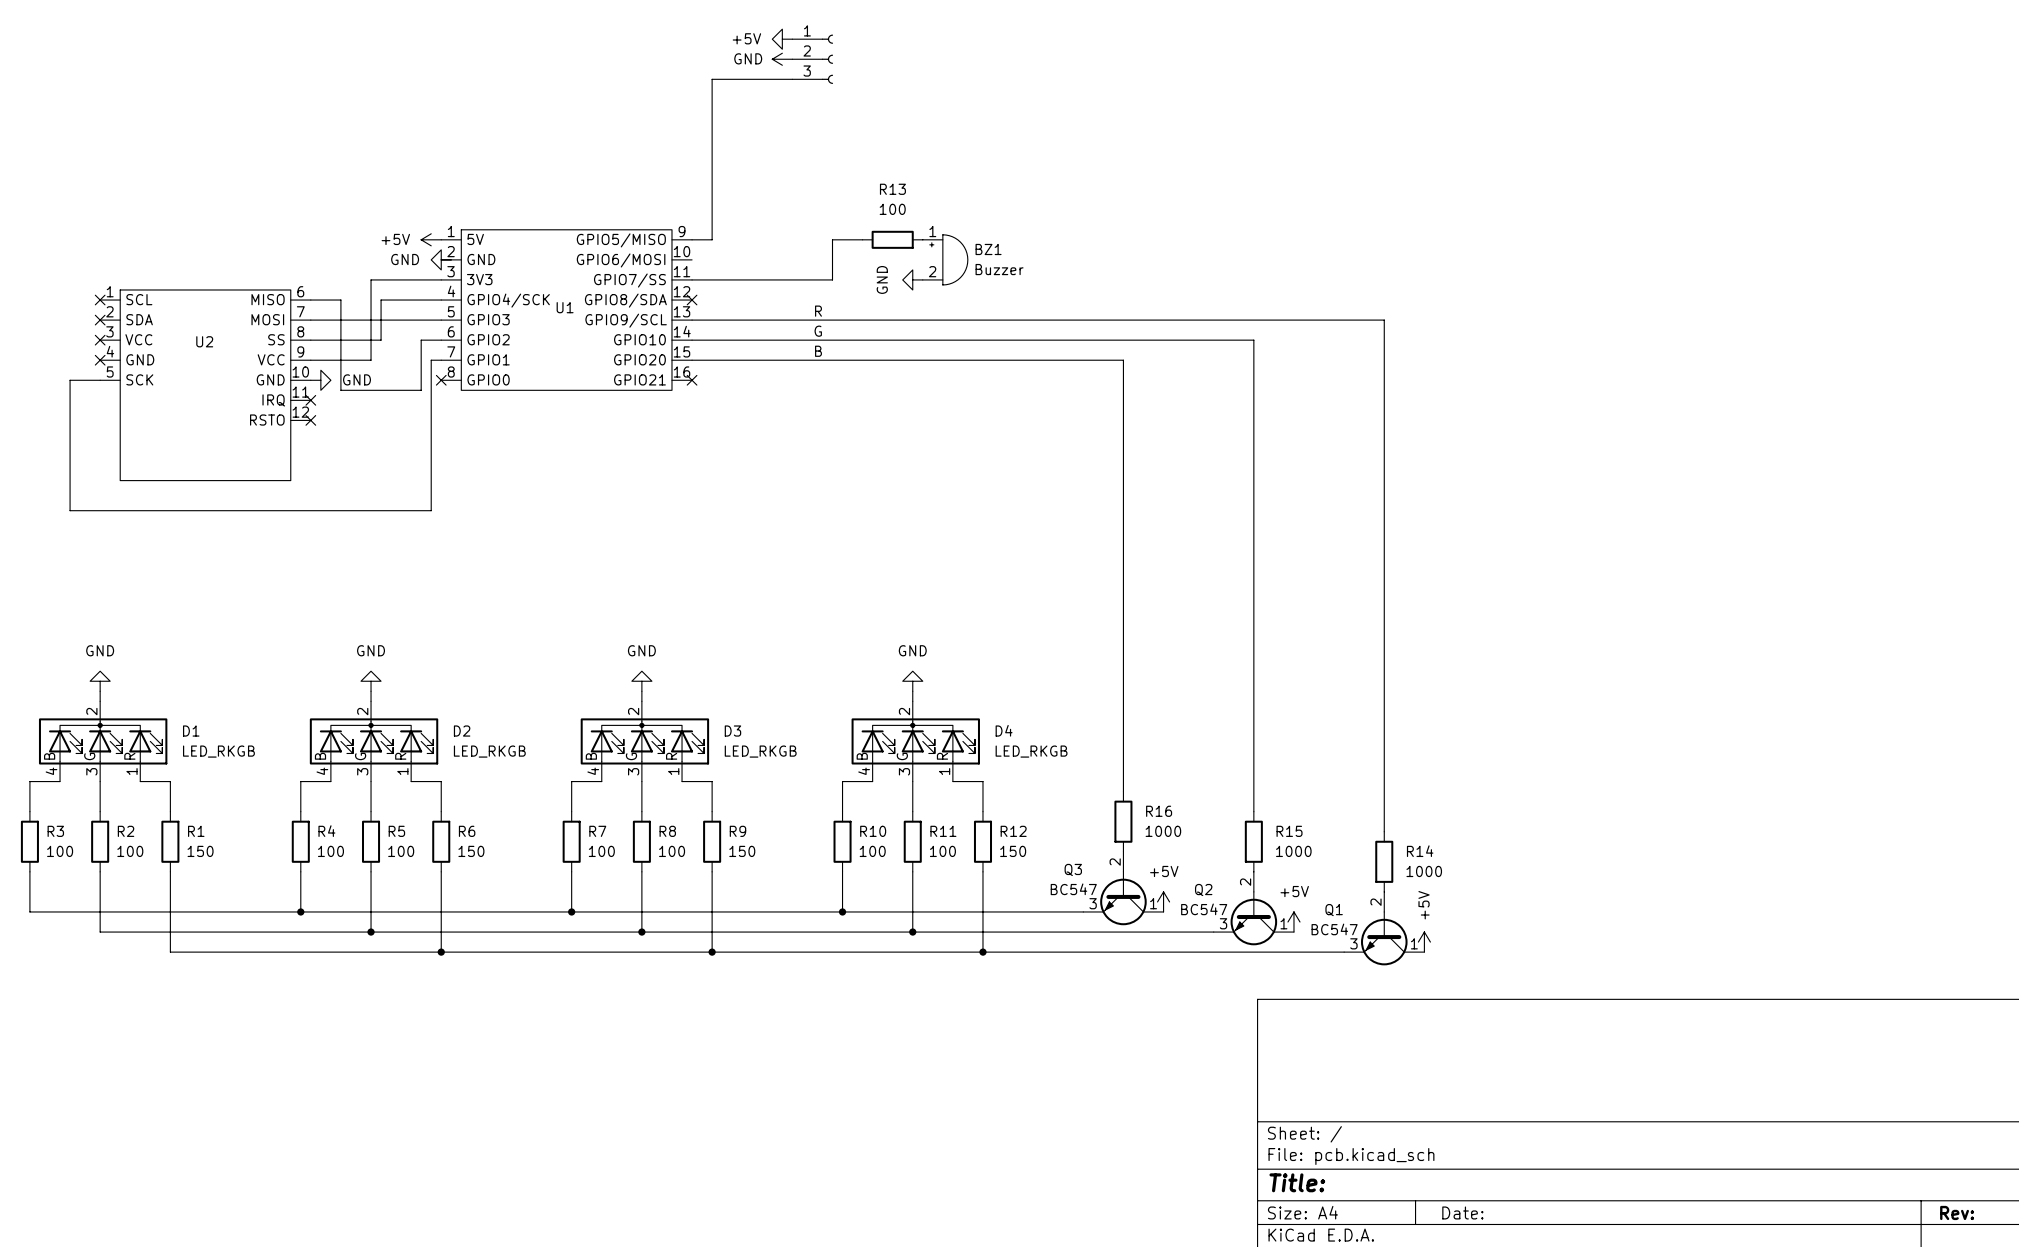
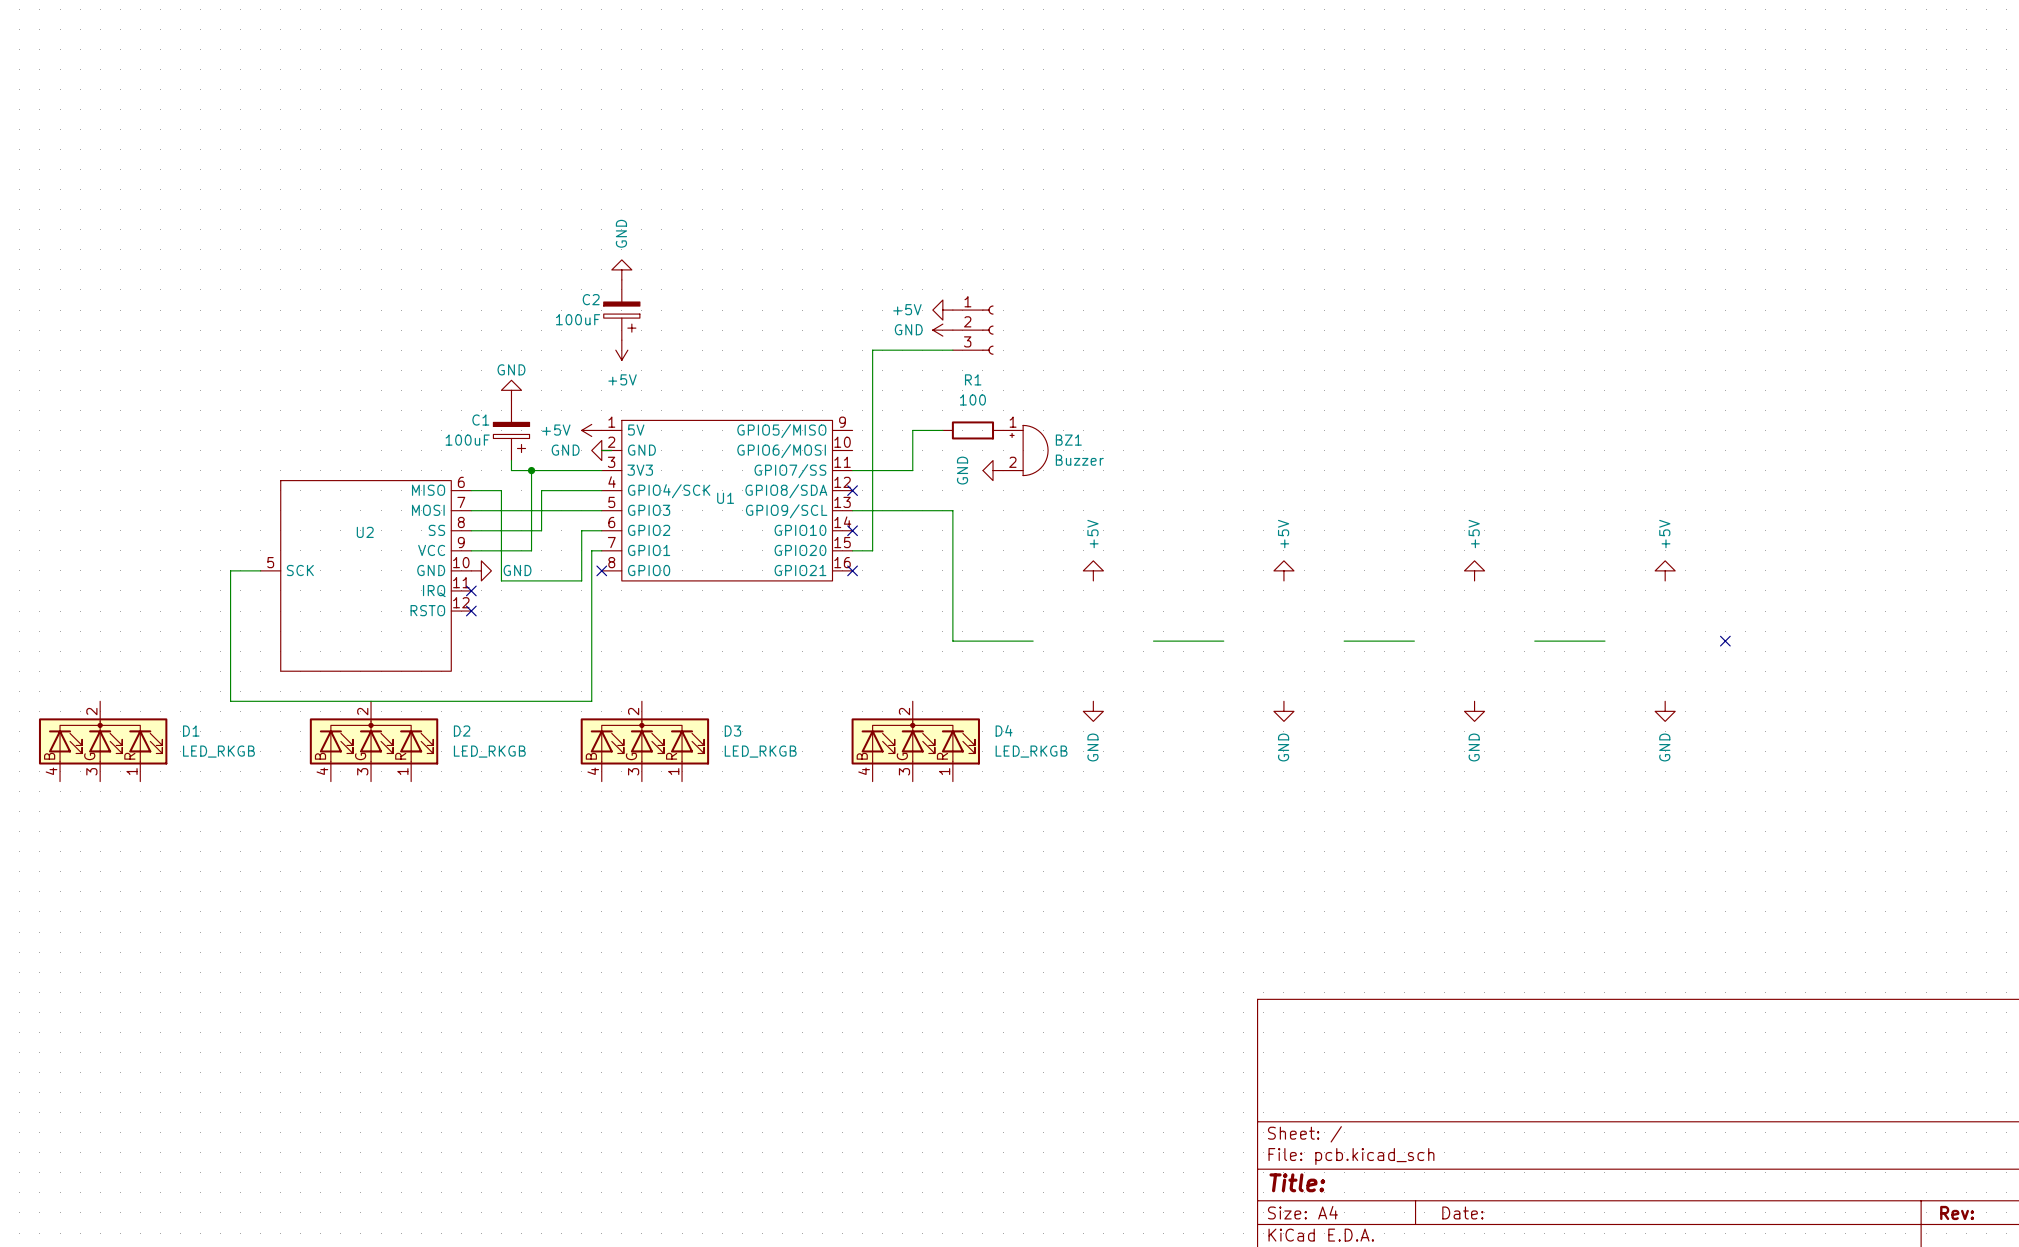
power symbol: +5V (782, 39) -> none
power symbol: GND (782, 59) -> none
part: (812, 59) -> none
wire: (792, 79) (712, 79) (712, 239) (692, 239) -> none
power symbol: +5V (431, 239) -> none
wire: (862, 239) (832, 239) (832, 279) (692, 279) -> none
R13: 100 (892, 239) -> none
power symbol: GND (441, 259) -> none
BZ1 position: (945, 259) -> (1025, 450)
power symbol: none -> GND (621, 269)
wire: (441, 279) (371, 279) (371, 360) (310, 360) -> none
power symbol: GND (912, 279) -> none
U2 symbol: [100, 289, 311, 481] -> [260, 480, 472, 672]
no-connect mark: (100, 300) -> none
wire: (310, 300) (340, 300) (340, 390) (421, 390) (421, 340) (441, 340) -> none
wire: (441, 300) (381, 300) (381, 340) (310, 340) -> none
no-connect mark: (692, 300) -> none
U1 position: (566, 310) -> (727, 500)
C2: none -> 100uF (621, 310)
power symbol: none -> +5V (942, 310)
label: R (818, 311) -> none
no-connect mark: (100, 320) -> none
wire: (310, 320) (441, 320) -> none
wire: (692, 320) (1384, 320) (1384, 831) -> none
power symbol: none -> GND (942, 330)
part: none -> (973, 330)
label: G (818, 331) -> none
no-connect mark: (100, 340) -> none
wire: (692, 340) (1253, 340) (1253, 811) -> none
power symbol: none -> +5V (621, 350)
wire: none -> (952, 350) (872, 350) (872, 550) (852, 550)
label: B (818, 351) -> none
no-connect mark: (100, 360) -> none
wire: (441, 360) (431, 360) (431, 510) (70, 510) (70, 380) (100, 380) -> none
wire: (692, 360) (1123, 360) (1123, 791) -> none
power symbol: GND (320, 380) -> none
no-connect mark: (441, 380) -> none
no-connect mark: (692, 380) -> none
power symbol: none -> GND (511, 390)
no-connect mark: (310, 400) -> none
no-connect mark: (310, 420) -> none
C1: none -> 100uF (511, 430)
power symbol: none -> +5V (591, 430)
wire: none -> (942, 430) (912, 430) (912, 470) (852, 470)
wire: none -> (601, 450) (611, 450)
power symbol: none -> GND (601, 450)
wire: none -> (511, 460) (511, 470) (601, 470)
wire: none -> (531, 470) (531, 550) (471, 550)
junction: none -> (531, 470)
power symbol: none -> GND (993, 470)
wire: none -> (471, 490) (501, 490) (501, 580) (581, 580) (581, 530) (601, 530)
wire: none -> (601, 490) (541, 490) (541, 530) (471, 530)
no-connect mark: none -> (852, 490)
wire: none -> (471, 510) (601, 510)
wire: none -> (852, 510) (952, 510) (952, 641) (1033, 641)
no-connect mark: none -> (852, 530)
wire: none -> (601, 550) (591, 550) (591, 701) (230, 701) (230, 570) (260, 570)
power symbol: none -> GND (481, 570)
no-connect mark: none -> (601, 570)
no-connect mark: none -> (852, 570)
power symbol: none -> +5V (1093, 570)
power symbol: none -> +5V (1283, 570)
power symbol: none -> +5V (1474, 570)
power symbol: none -> +5V (1665, 570)
no-connect mark: none -> (471, 590)
no-connect mark: none -> (471, 611)
wire: none -> (1153, 641) (1223, 641)
wire: none -> (1344, 641) (1414, 641)
wire: none -> (1534, 641) (1604, 641)
no-connect mark: none -> (1725, 641)
power symbol: GND (100, 681) -> none
power symbol: GND (371, 681) -> none
power symbol: GND (641, 681) -> none
power symbol: GND (912, 681) -> none
wire: (100, 691) (100, 701) -> none
wire: (371, 691) (371, 701) -> none
wire: (641, 691) (641, 701) -> none
wire: (912, 691) (912, 701) -> none
power symbol: none -> GND (1093, 711)
power symbol: none -> GND (1283, 711)
power symbol: none -> GND (1474, 711)
power symbol: none -> GND (1665, 711)
wire: (60, 781) (29, 781) (29, 811) -> none
wire: (100, 781) (100, 811) -> none
wire: (140, 781) (170, 781) (170, 811) -> none
wire: (330, 781) (300, 781) (300, 811) -> none
wire: (371, 781) (371, 811) -> none
wire: (411, 781) (441, 781) (441, 811) -> none
wire: (601, 781) (571, 781) (571, 811) -> none
wire: (641, 781) (641, 811) -> none
wire: (682, 781) (712, 781) (712, 811) -> none
wire: (872, 781) (842, 781) (842, 811) -> none
wire: (912, 781) (912, 811) -> none
wire: (952, 781) (982, 781) (982, 811) -> none
R16: 1000 (1123, 821) -> none
R1 name position: R1 (196, 831) -> R1 (973, 379)
R3: 100 (29, 841) -> none
R2: 100 (100, 841) -> none
R1 rotation: 0° (170, 841) -> 90° clockwise (972, 430)
R1 position: (170, 841) -> (972, 430)
R4: 100 (300, 841) -> none
R5: 100 (371, 841) -> none
R6: 150 (441, 841) -> none
R7: 100 (571, 841) -> none
R8: 100 (641, 841) -> none
R9: 150 (712, 841) -> none
R10: 100 (842, 841) -> none
R11: 100 (912, 841) -> none
R12: 150 (982, 841) -> none
R15: 1000 (1253, 841) -> none
R1 value: 150 (200, 851) -> 100 (972, 399)
R14: 1000 (1384, 861) -> none
wire: (29, 871) (29, 911) (1083, 911) -> none
wire: (100, 871) (100, 932) (1213, 932) -> none
wire: (170, 871) (170, 952) (1344, 952) -> none
wire: (300, 871) (300, 911) -> none
wire: (371, 871) (371, 932) -> none
wire: (441, 871) (441, 952) -> none
wire: (571, 871) (571, 911) -> none
wire: (641, 871) (641, 932) -> none
wire: (712, 871) (712, 952) -> none
wire: (842, 871) (842, 911) -> none
wire: (912, 871) (912, 932) -> none
wire: (982, 871) (982, 952) -> none
Q3: BC547 (1123, 888) -> none
power symbol: +5V (1163, 901) -> none
Q2: BC547 (1253, 908) -> none
junction: (300, 911) -> none
junction: (571, 911) -> none
junction: (842, 911) -> none
power symbol: +5V (1293, 922) -> none
Q1: BC547 (1384, 928) -> none
junction: (371, 932) -> none
junction: (641, 932) -> none
junction: (912, 932) -> none
power symbol: +5V (1424, 942) -> none
junction: (441, 952) -> none
junction: (712, 952) -> none
junction: (982, 952) -> none

